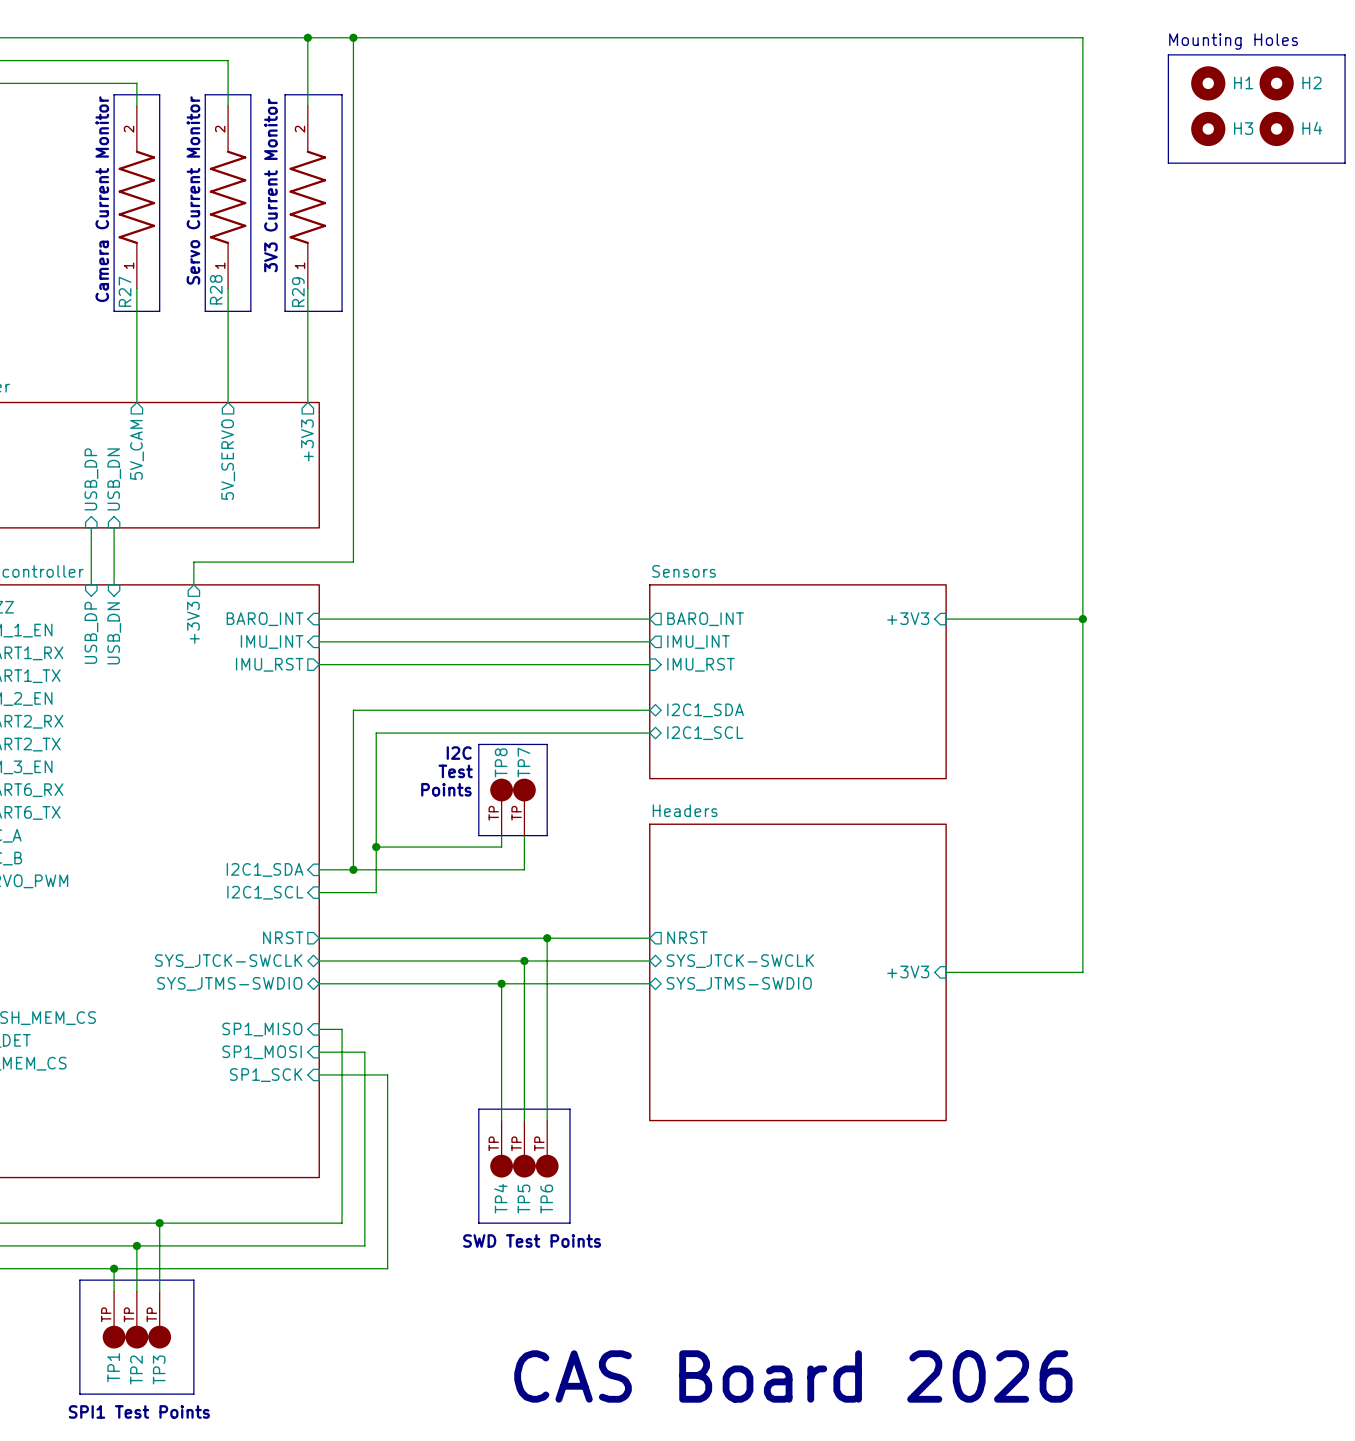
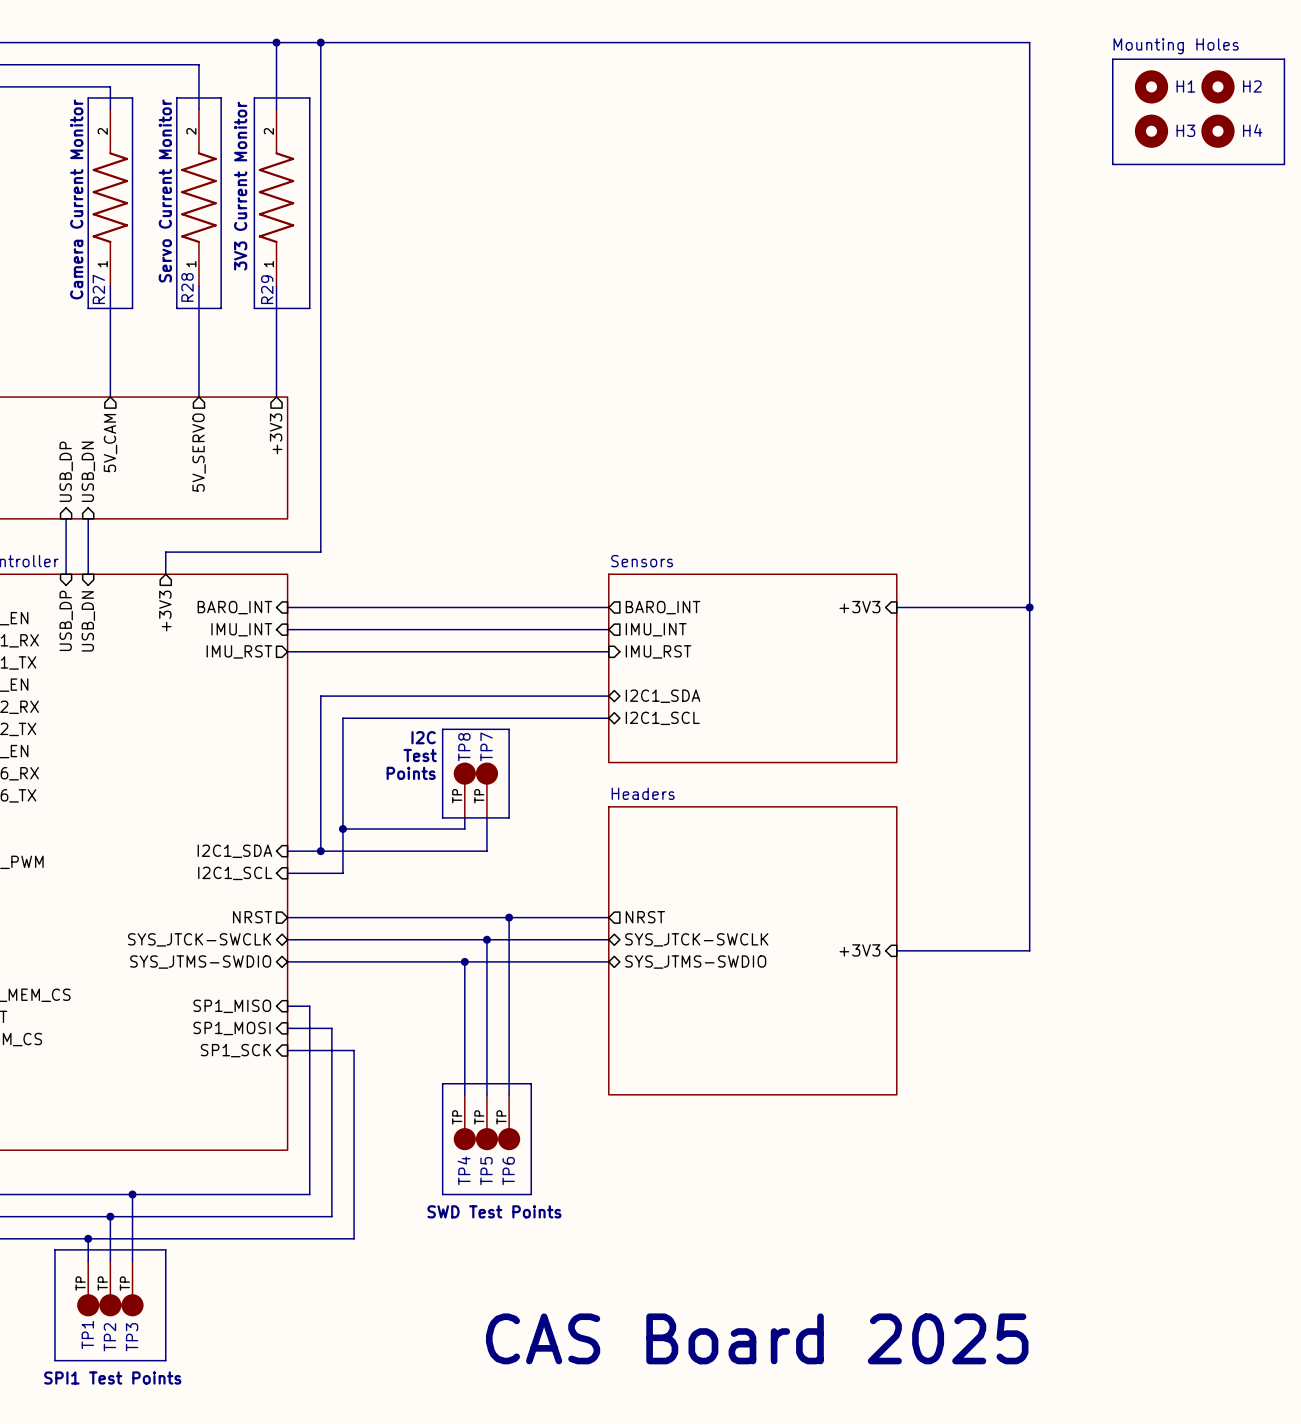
text: CAS Board 2026 (793, 1376) -> CAS Board 2025 (757, 1338)

